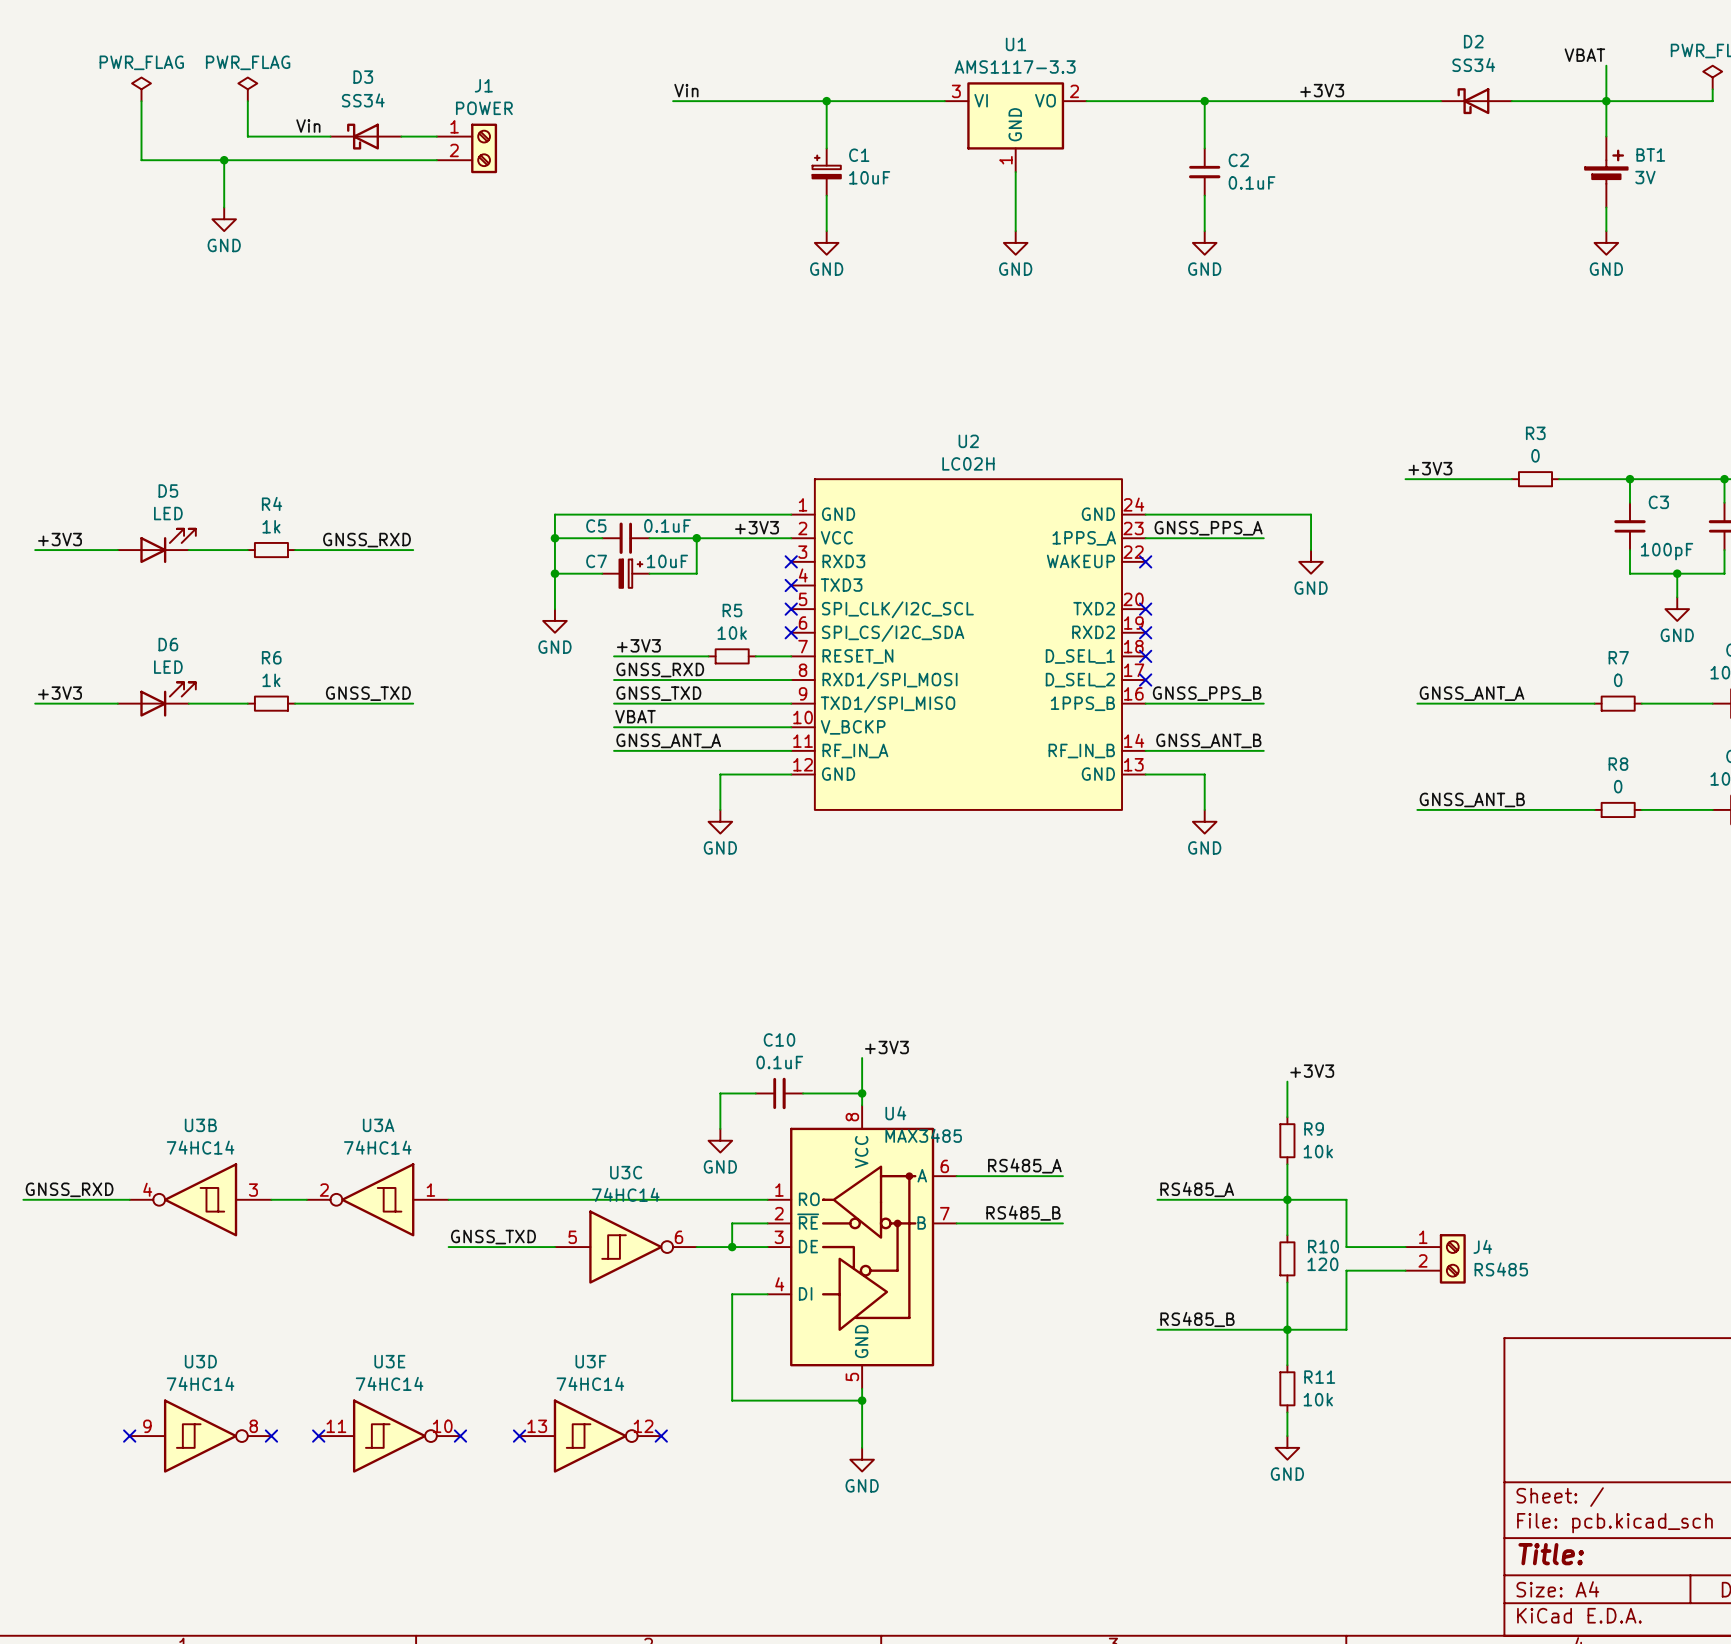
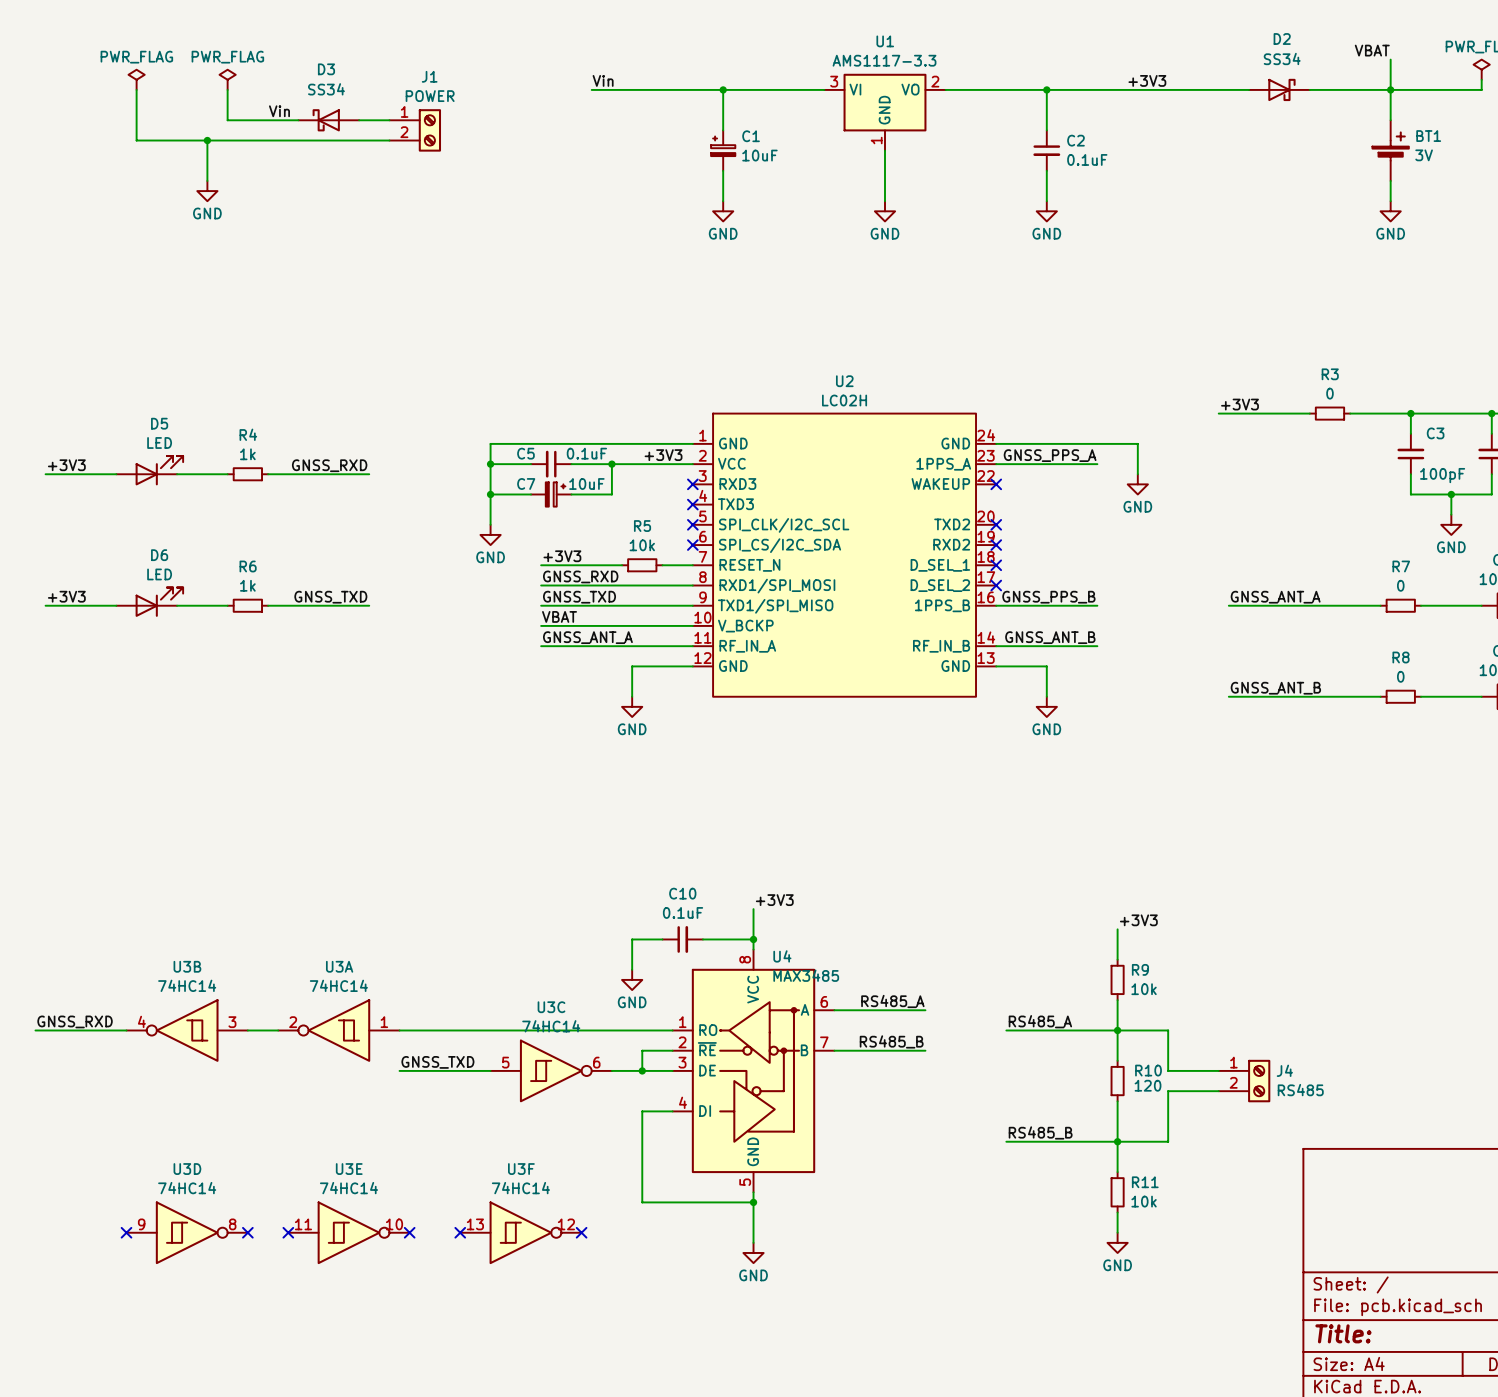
D2 flip: as is (1473, 101) -> left-right (1281, 89)

